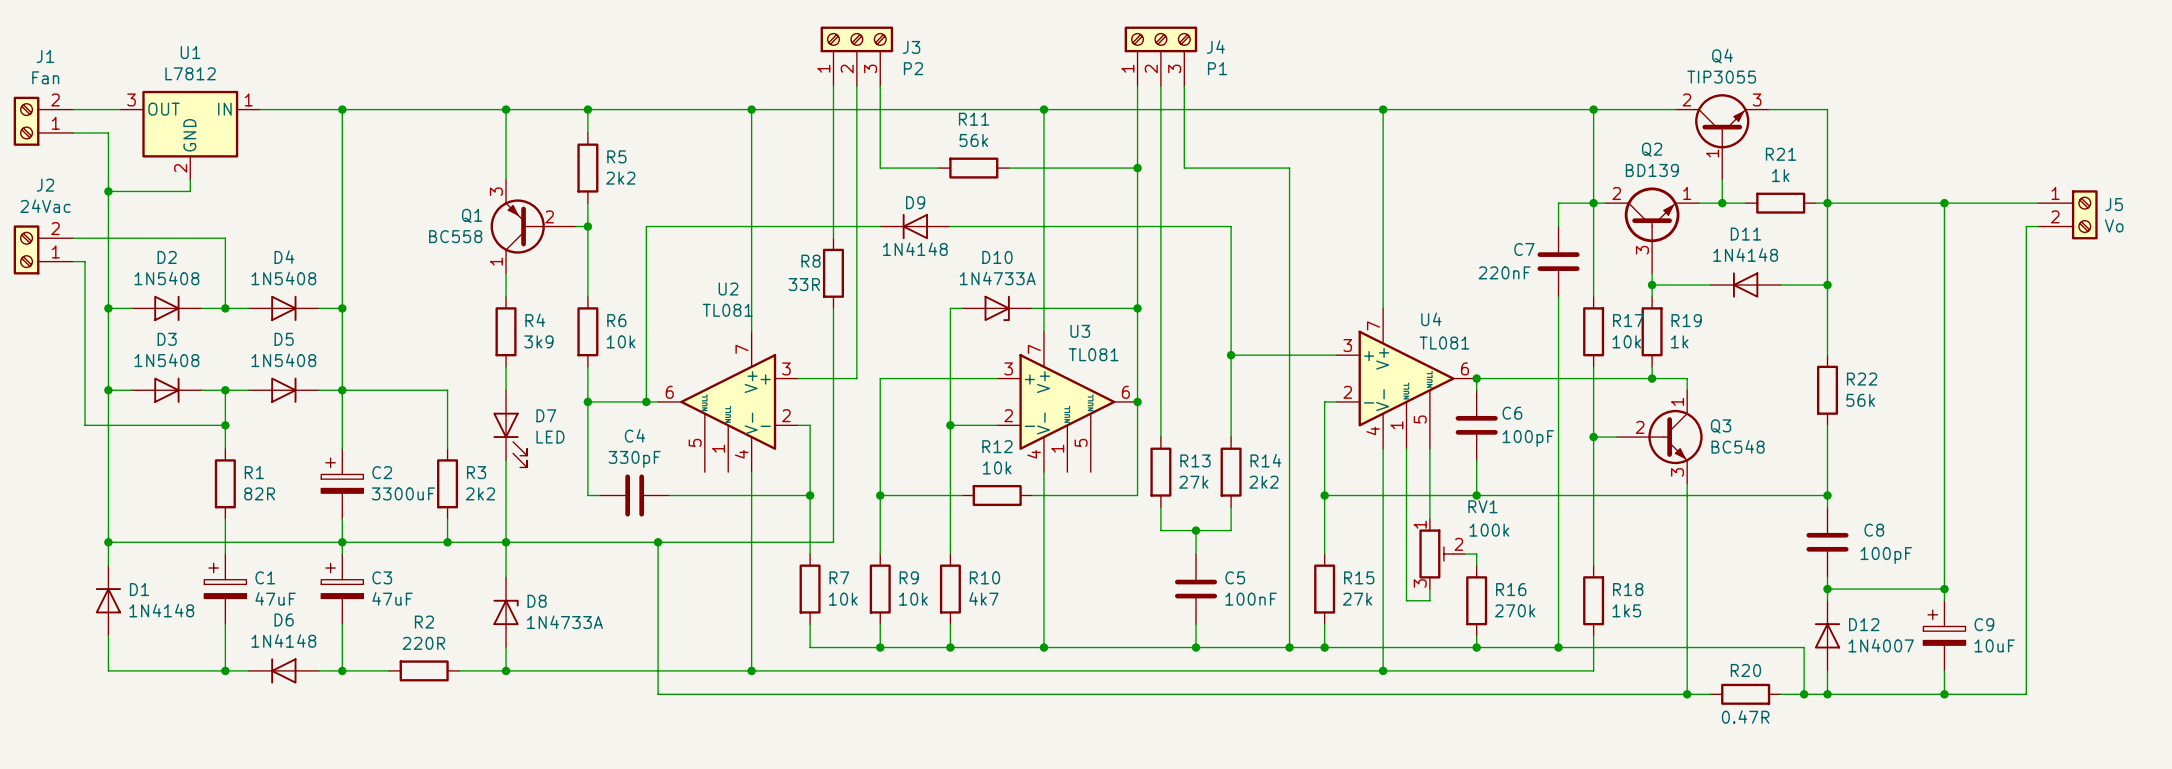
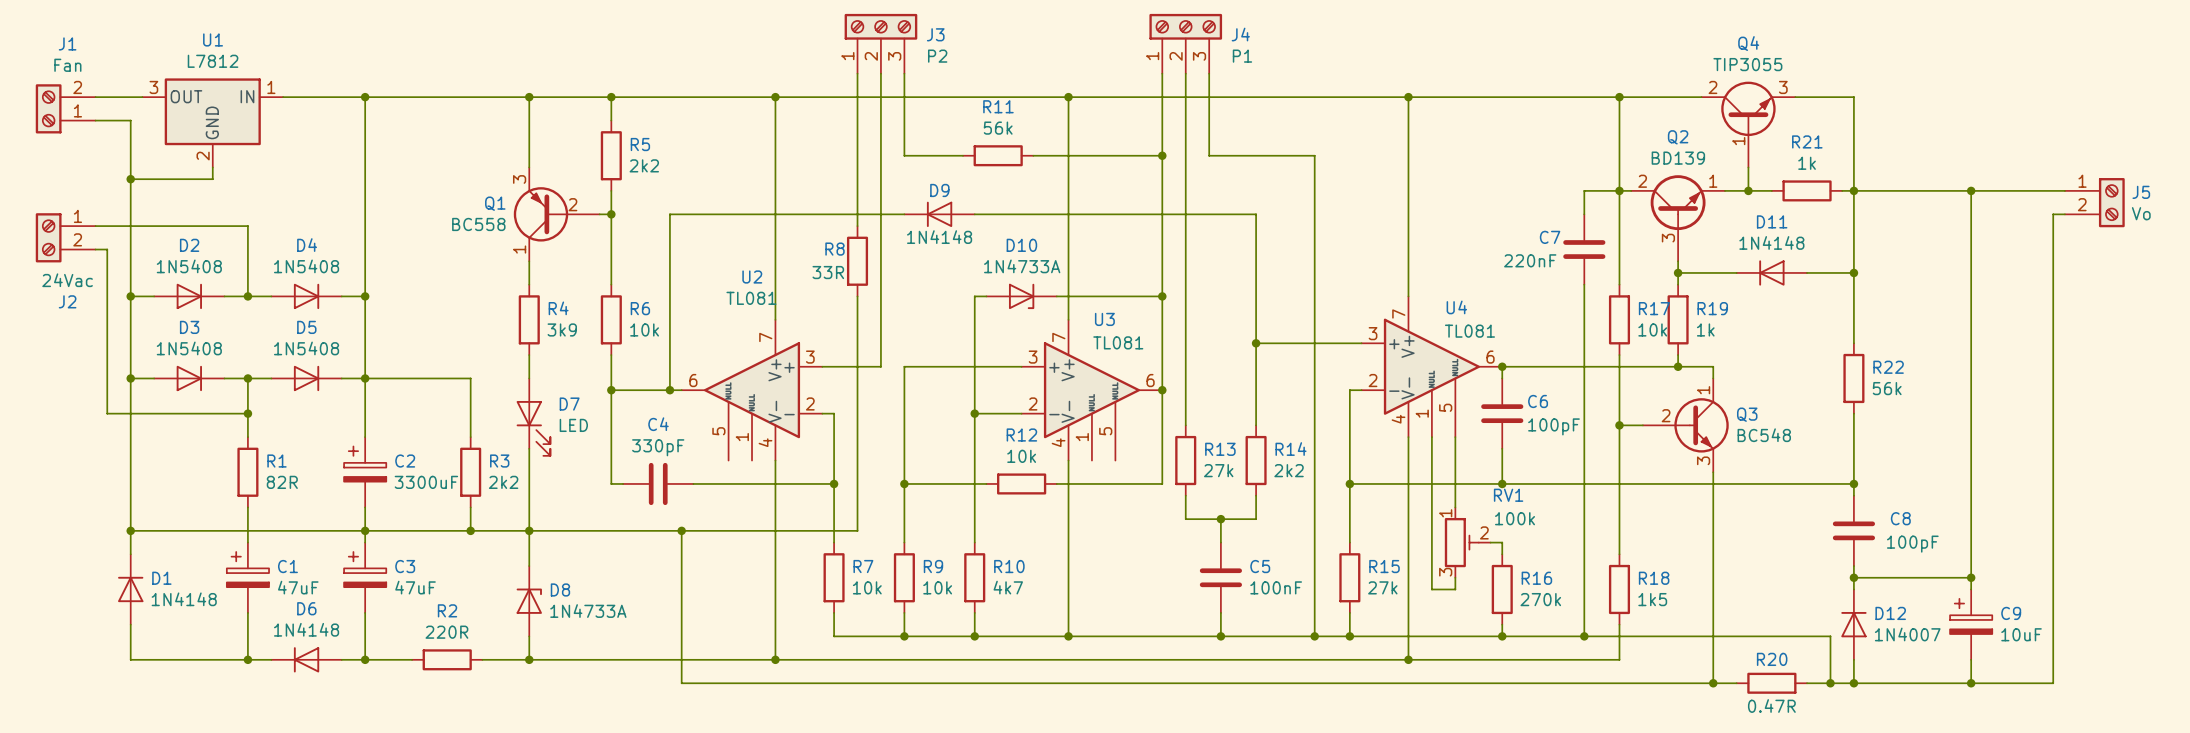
J2 flip: as is (26, 249) -> up-down (48, 237)

